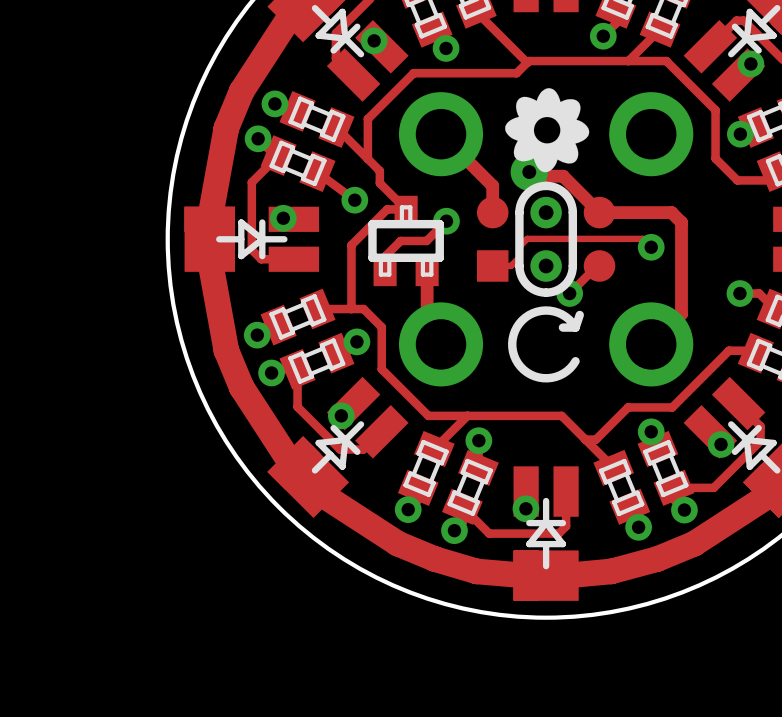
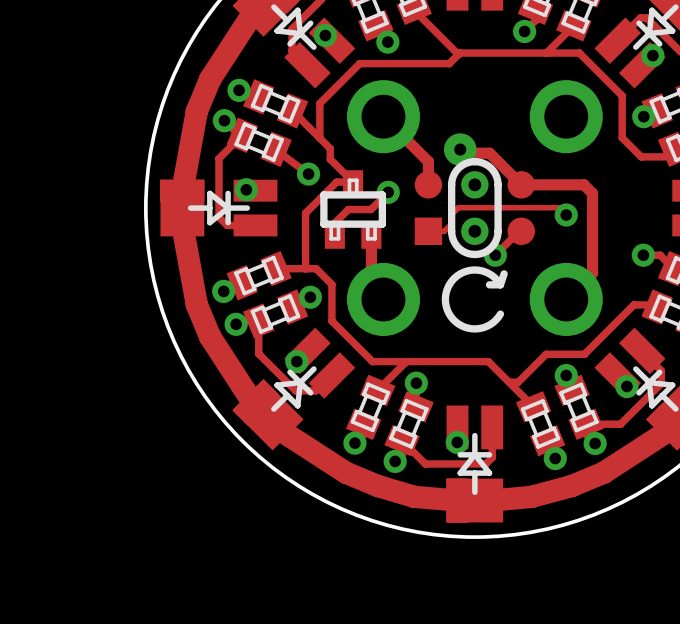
drawing: [505, 88, 590, 173] -> none

